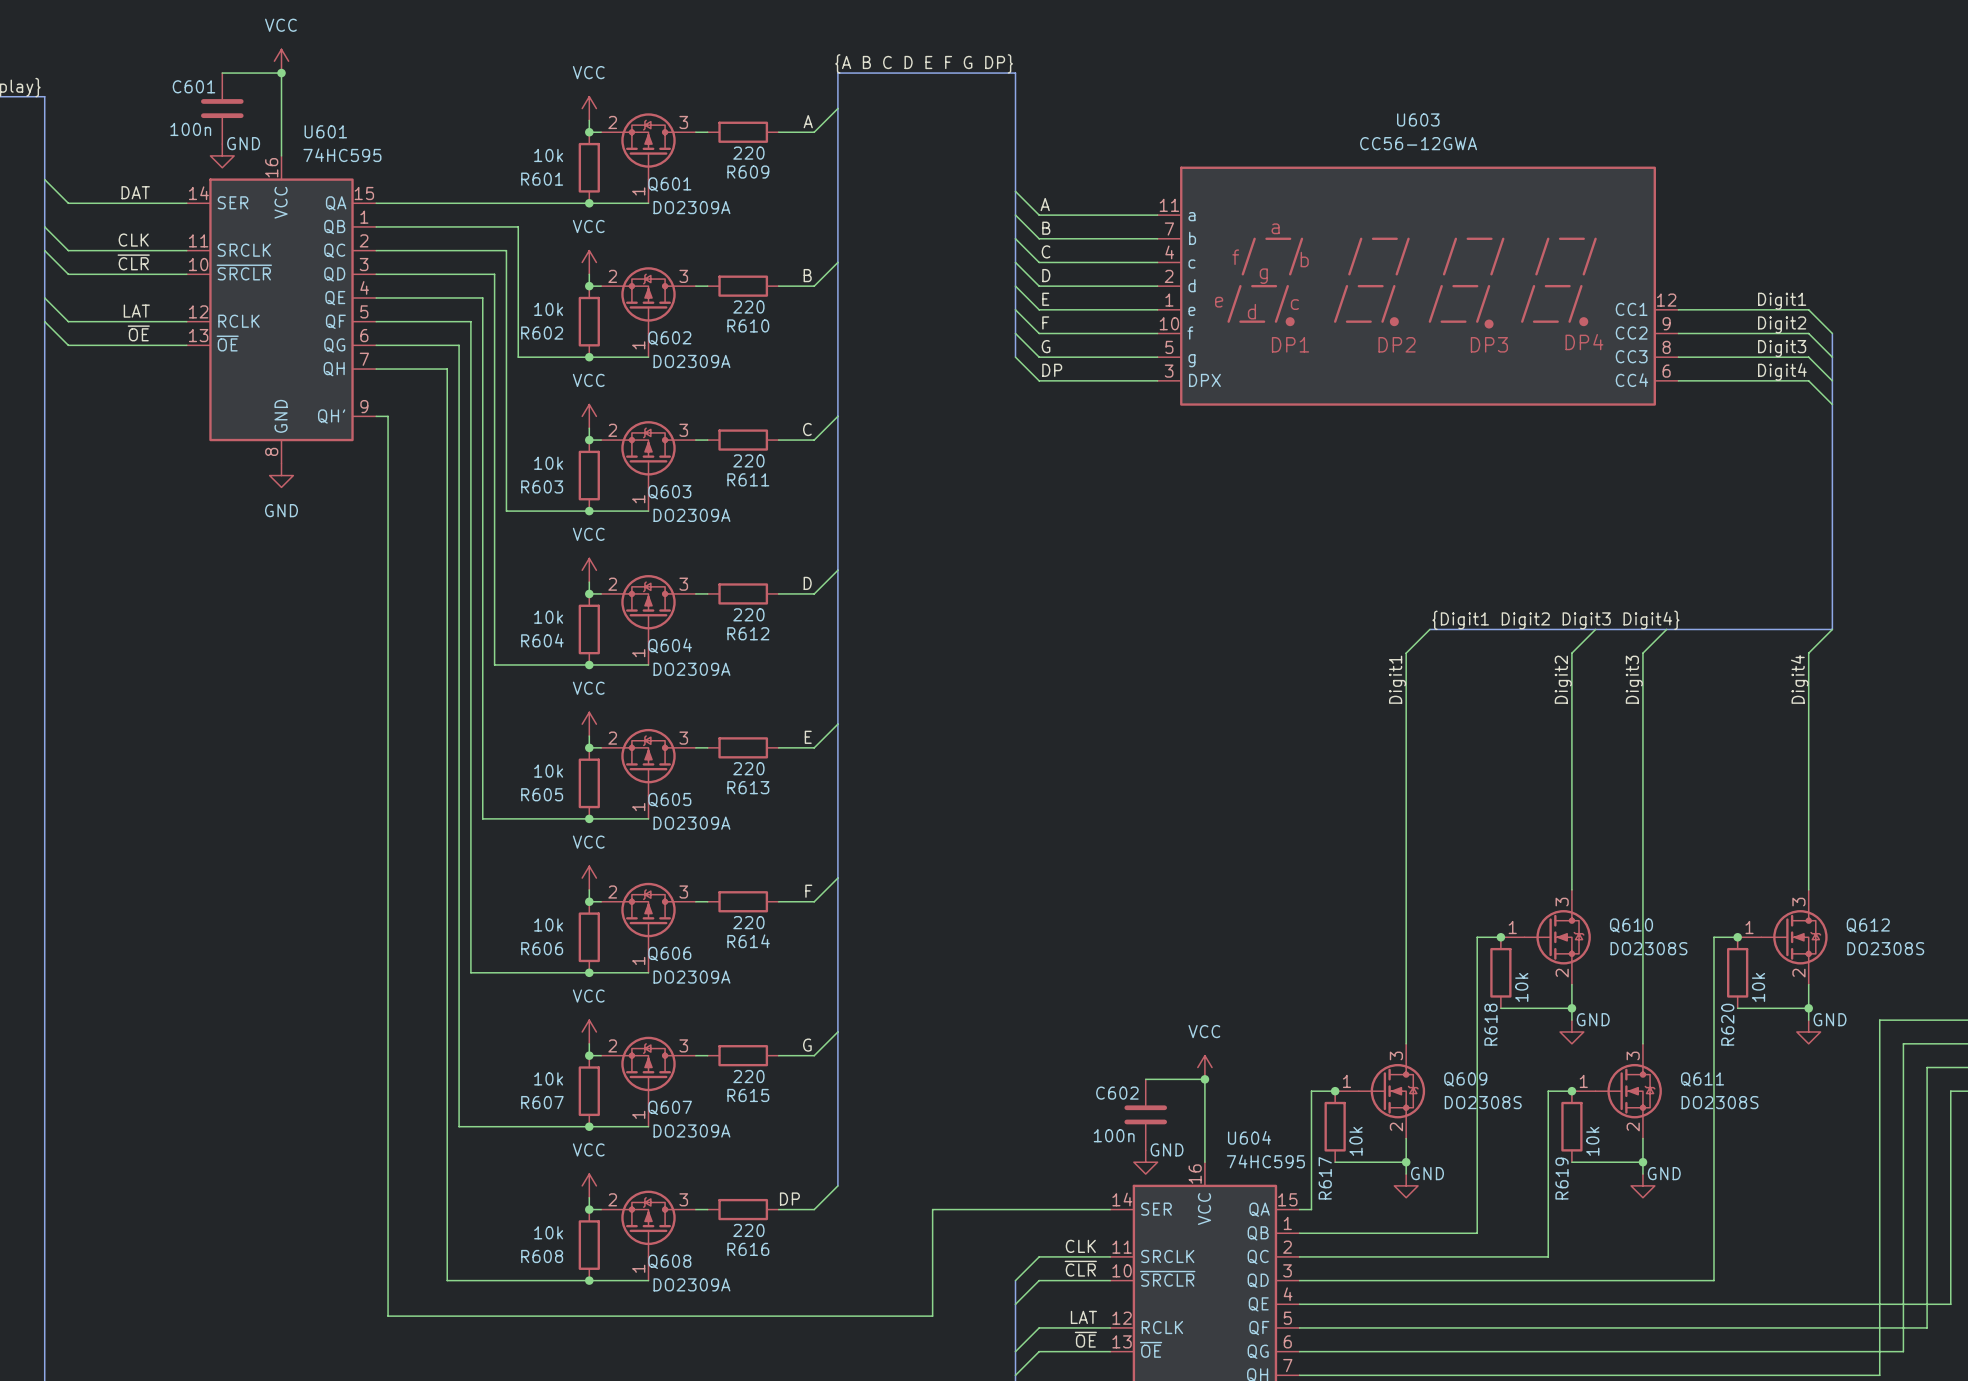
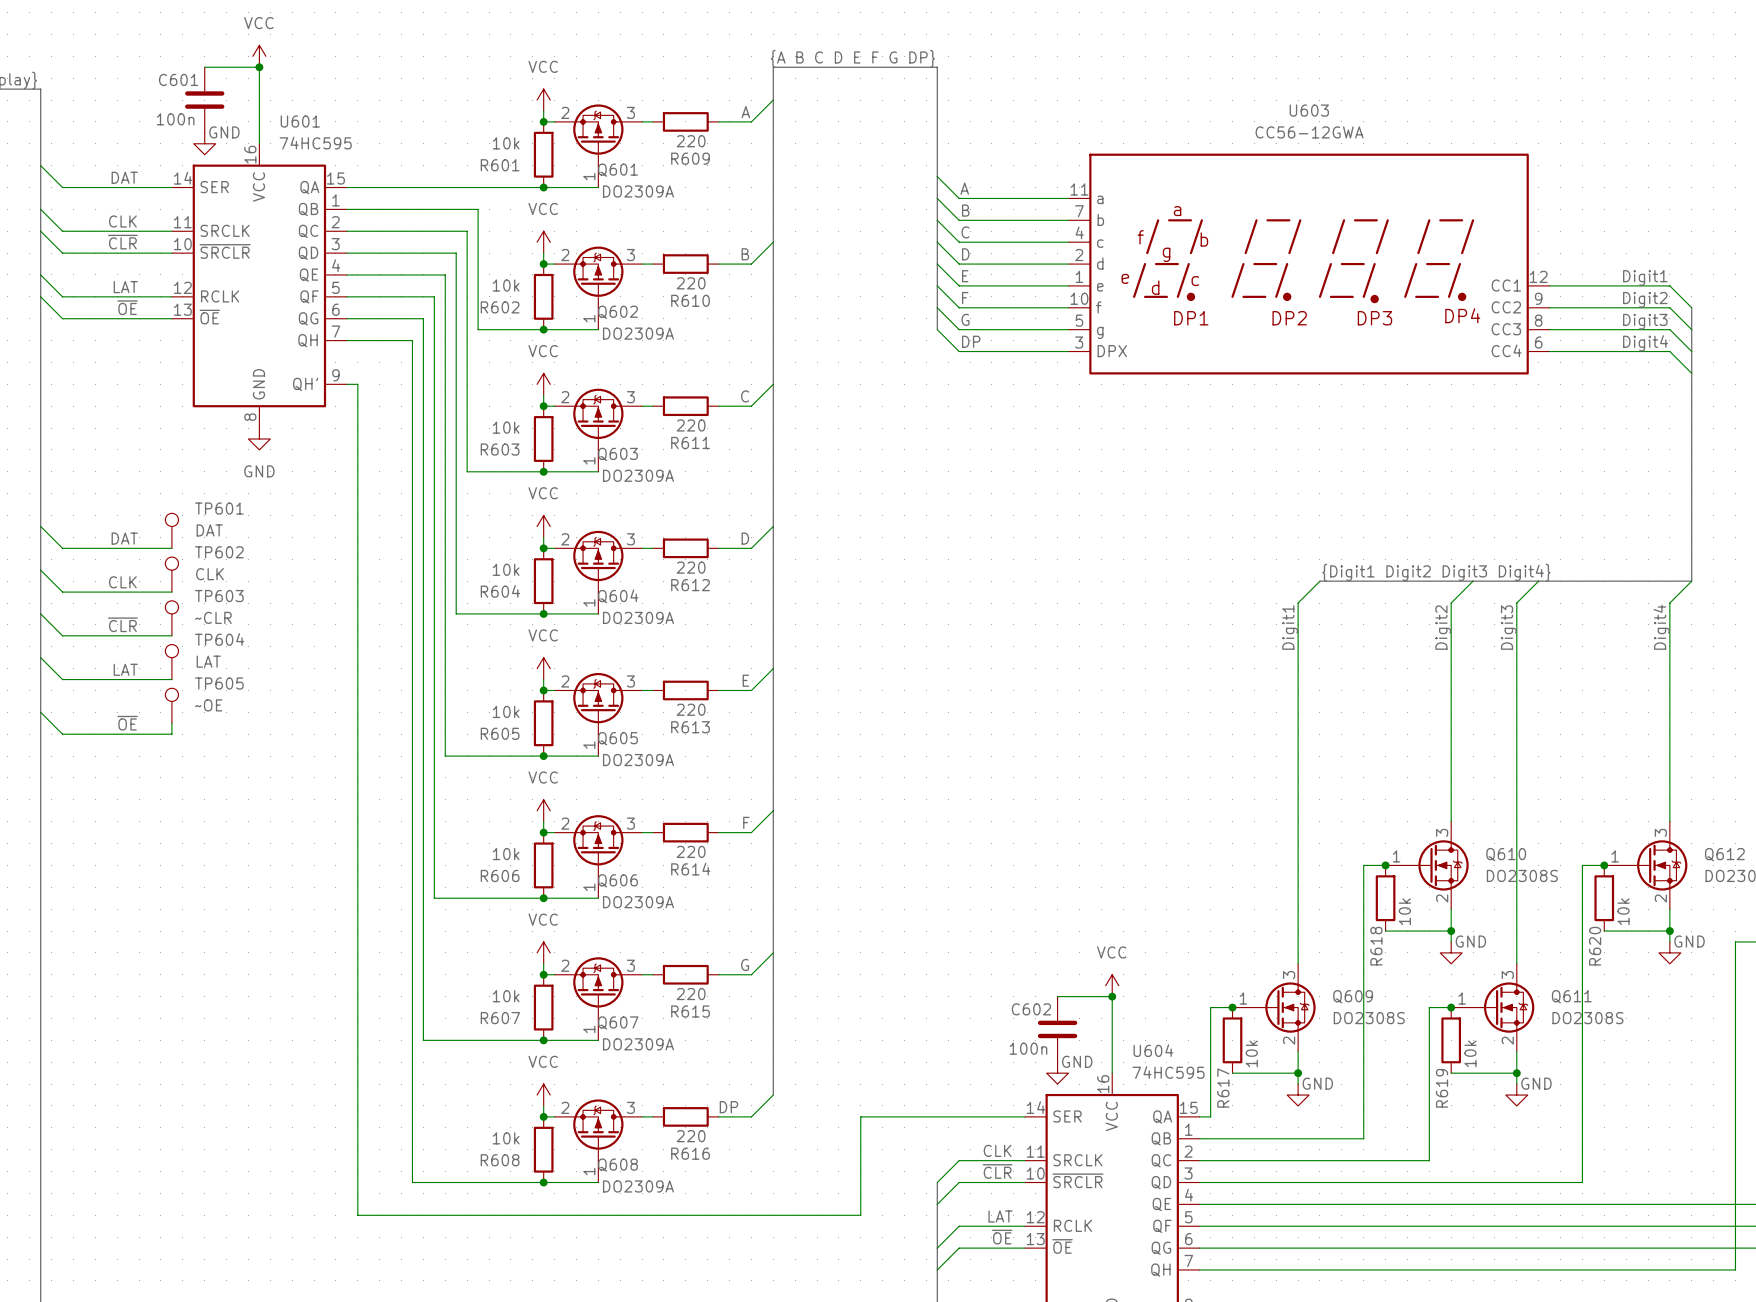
wire: none -> (40, 526) (62, 548) (171, 548)
TP601: none -> DAT (171, 530)
label: none -> DAT (124, 538)
wire: none -> (40, 570) (62, 592) (171, 592)
TP602: none -> CLK (171, 574)
label: none -> CLK (122, 582)
wire: none -> (40, 613) (62, 635) (171, 635)
TP603: none -> ~CLR (171, 618)
label: none -> ~{CLR} (122, 624)
wire: none -> (40, 657) (62, 679) (171, 679)
TP604: none -> LAT (171, 662)
label: none -> LAT (125, 669)
TP605: none -> ~OE (171, 705)
wire: none -> (40, 712) (62, 734) (171, 734) (171, 723)
label: none -> ~{OE} (127, 723)

